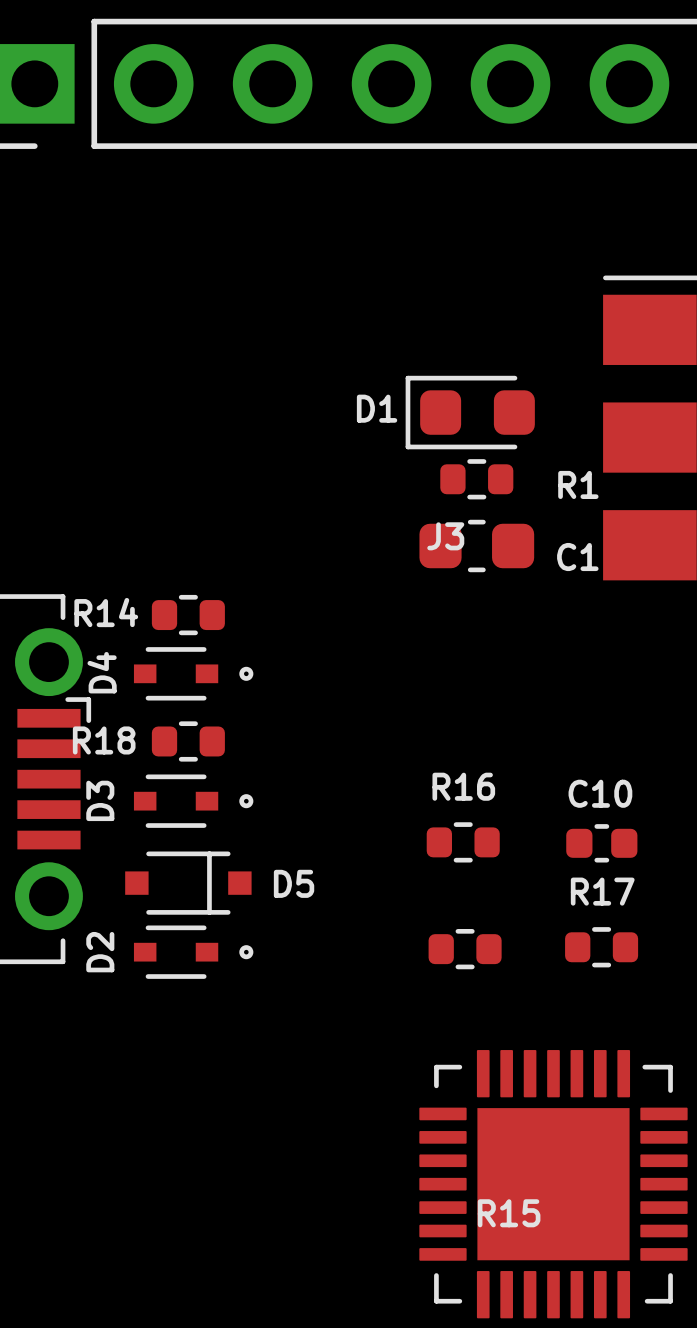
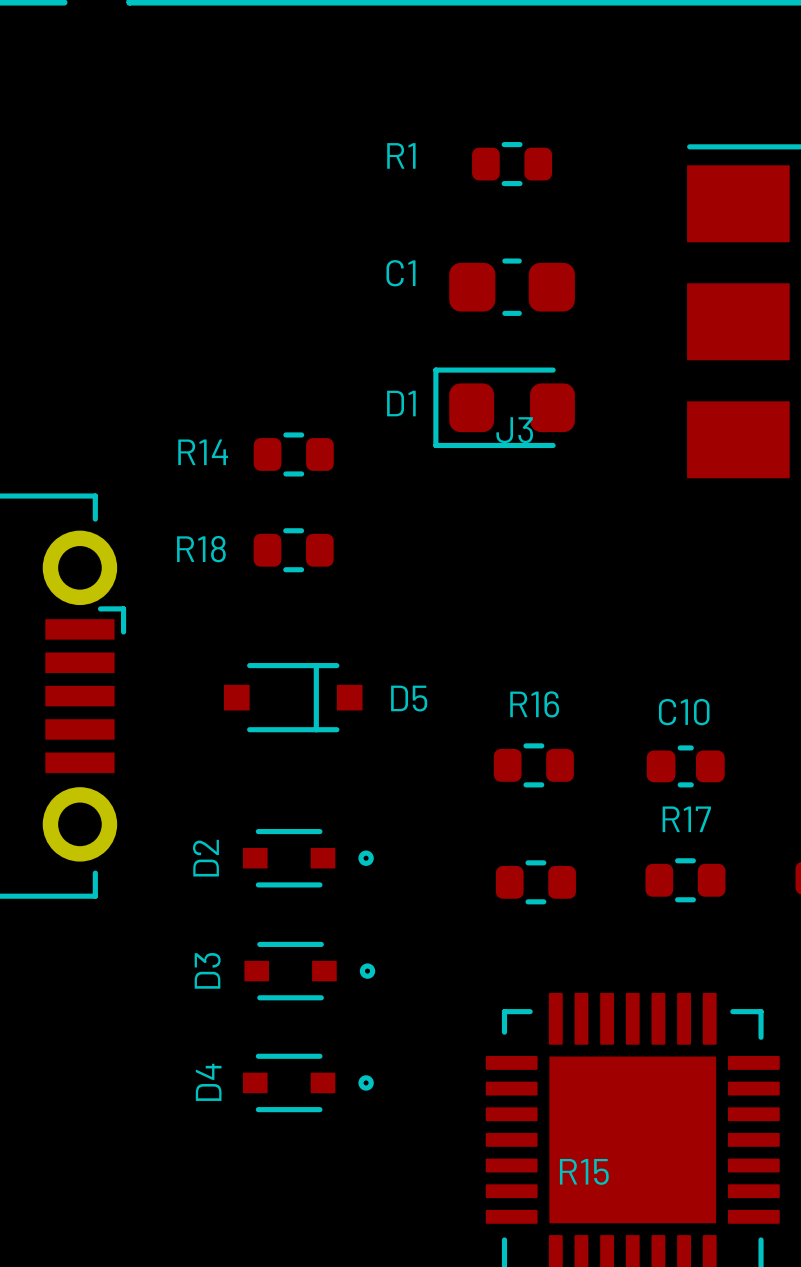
D1 position: (470, 412) -> (504, 407)
R1 position: (476, 479) -> (512, 164)
R1 name position: R1 (578, 484) -> R1 (401, 155)
C1 position: (476, 545) -> (512, 287)
C1 name position: C1 (577, 557) -> C1 (401, 273)
R14 position: (188, 615) -> (293, 454)
D4 position: (193, 673) -> (308, 1082)
R18 position: (188, 741) -> (293, 550)
D3 position: (193, 801) -> (309, 971)
D5 position: (188, 883) -> (293, 697)
D2 position: (193, 952) -> (308, 858)

